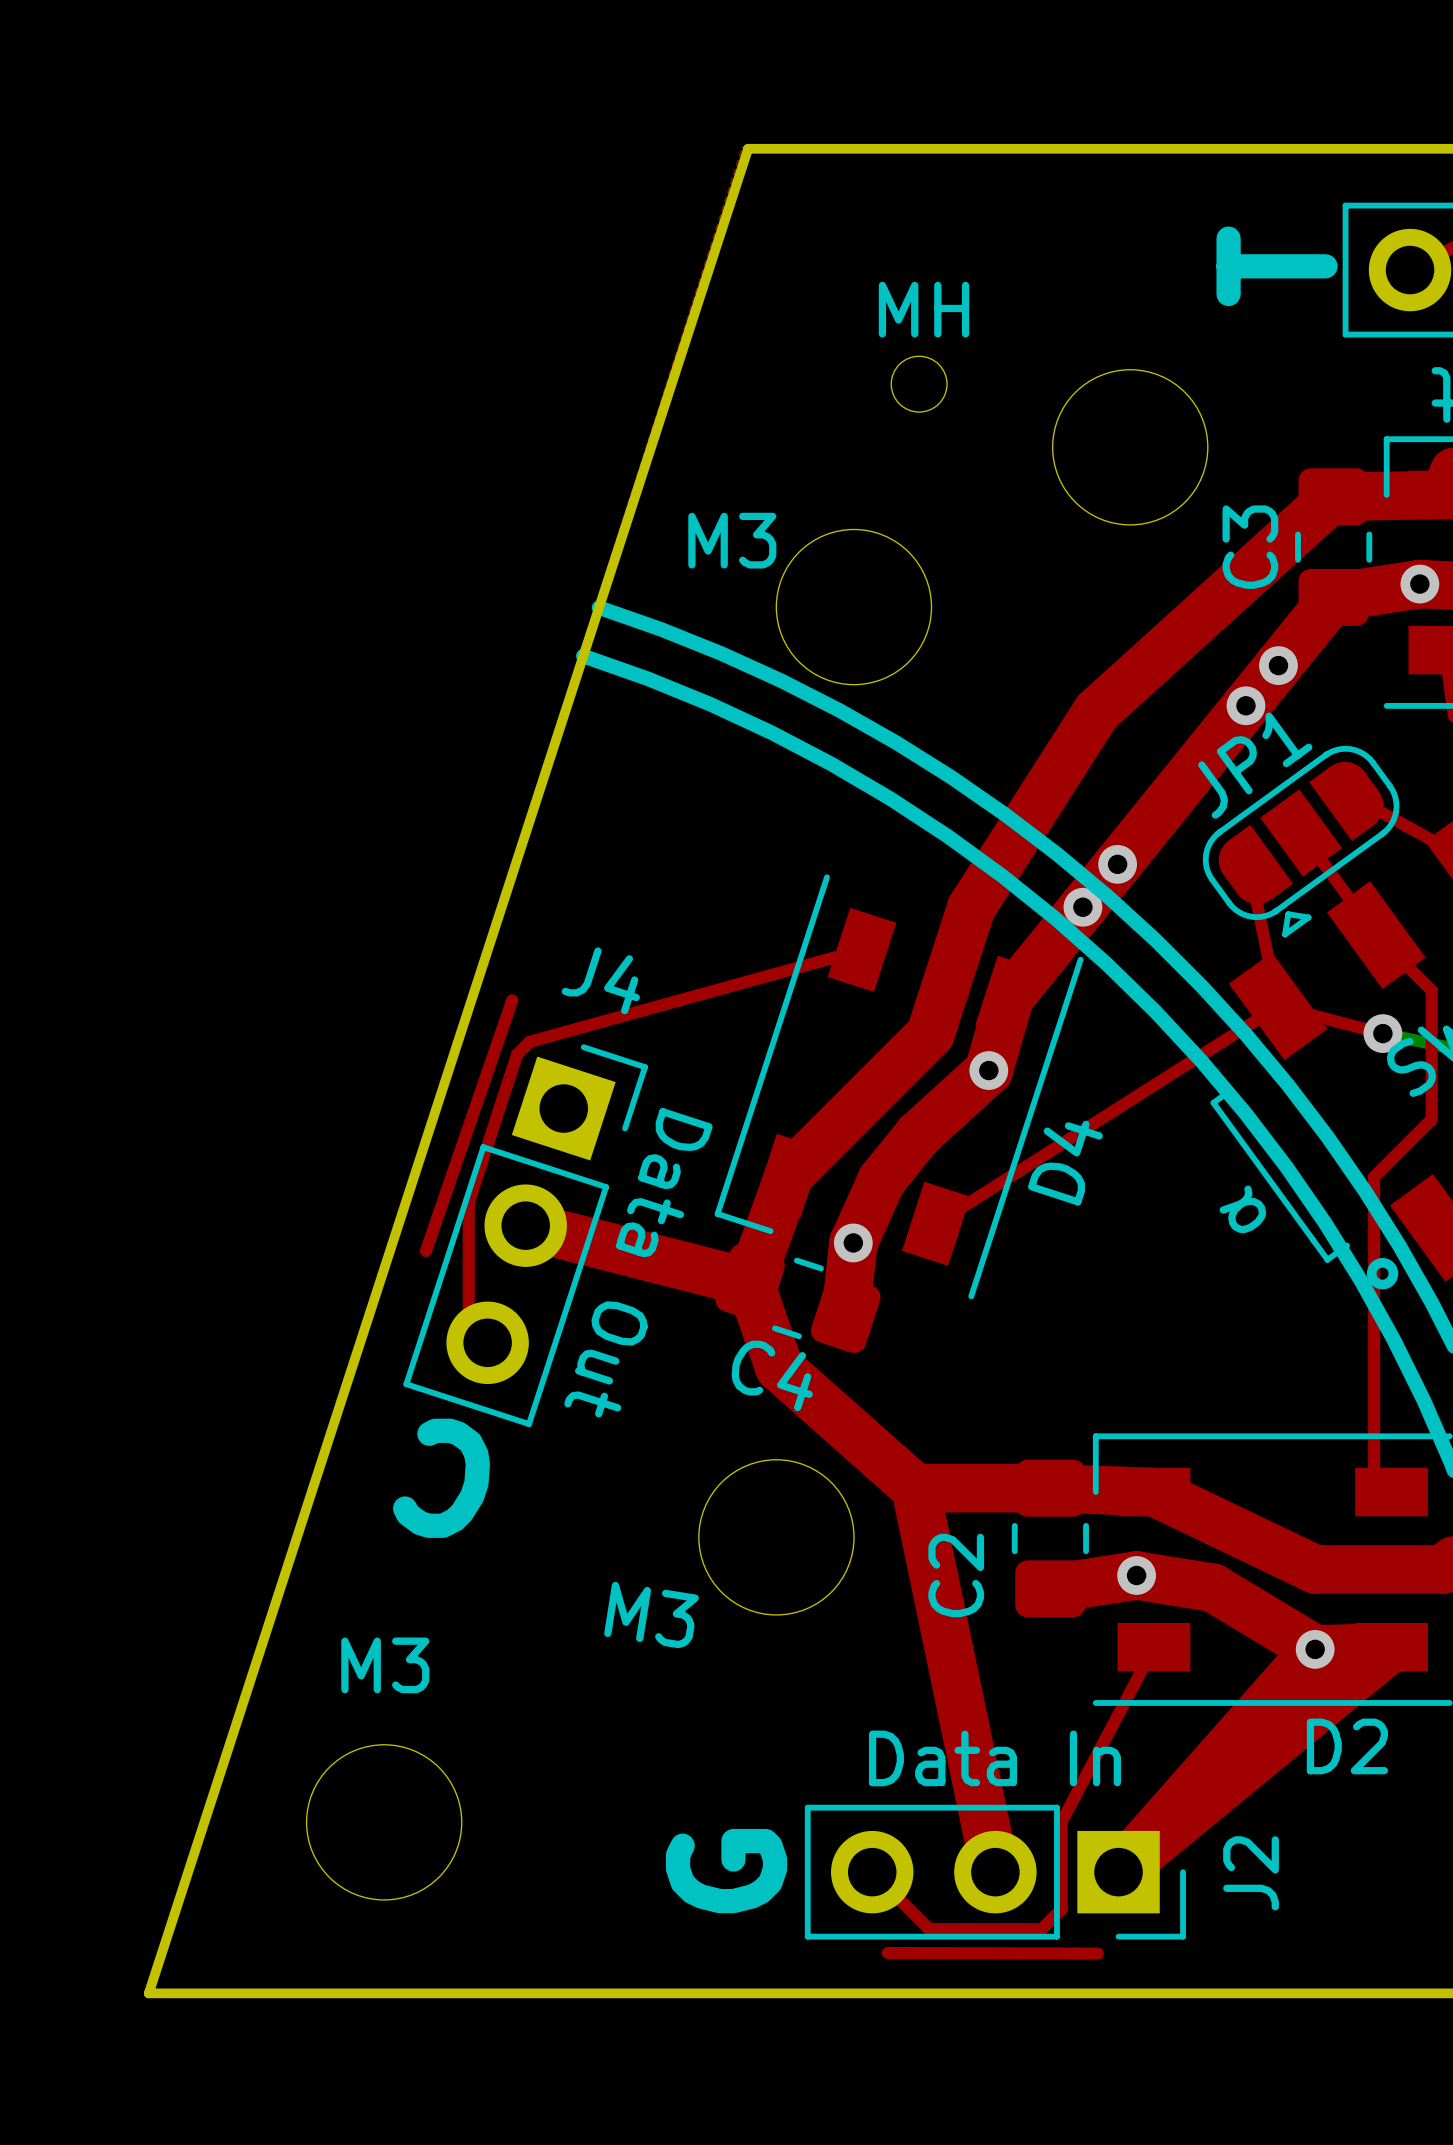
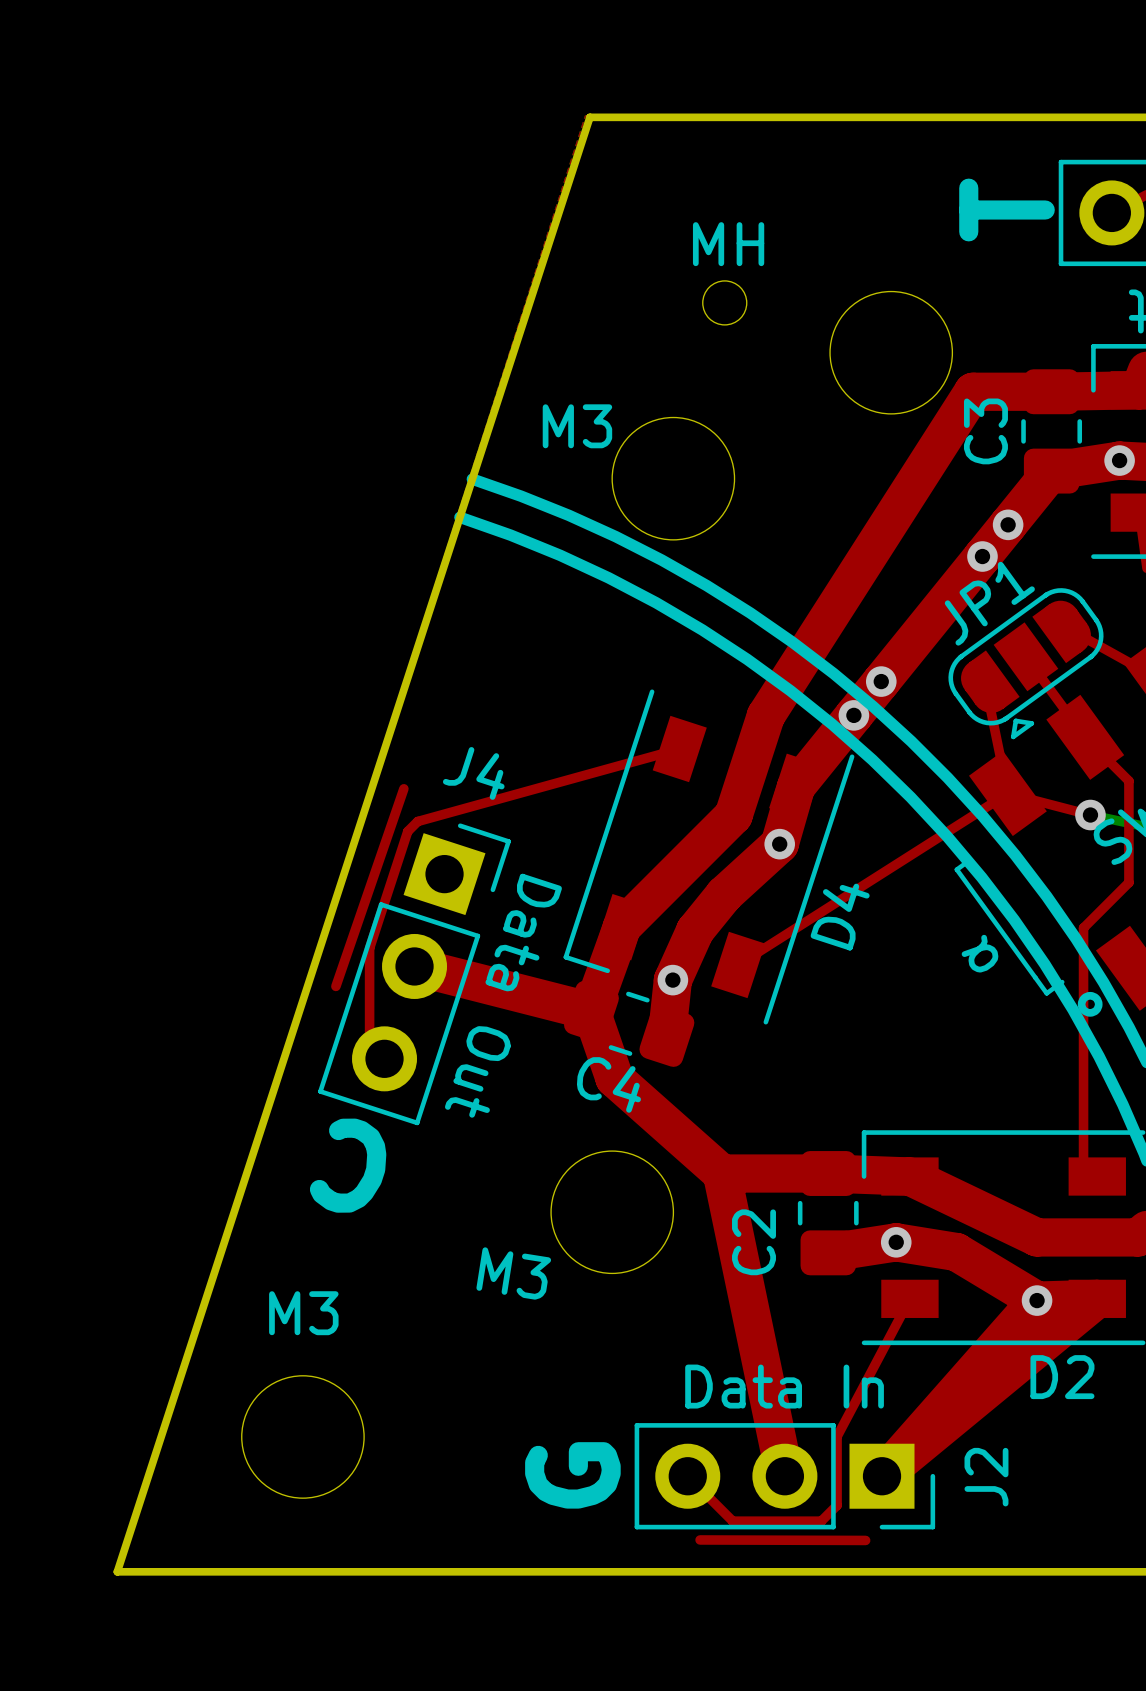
top track: (1333, 496) (1096, 711) -> (1051, 391) (973, 391) (864, 561)

